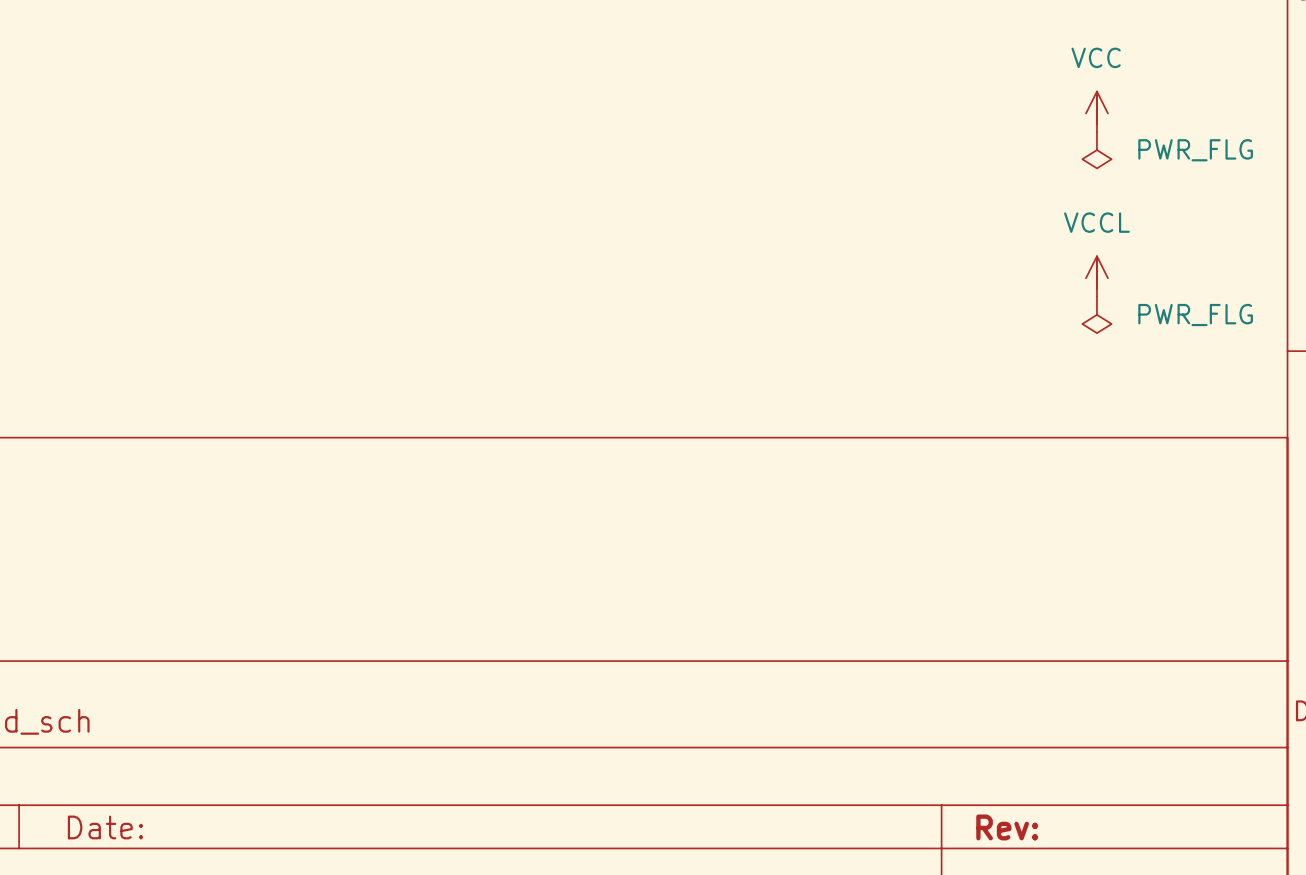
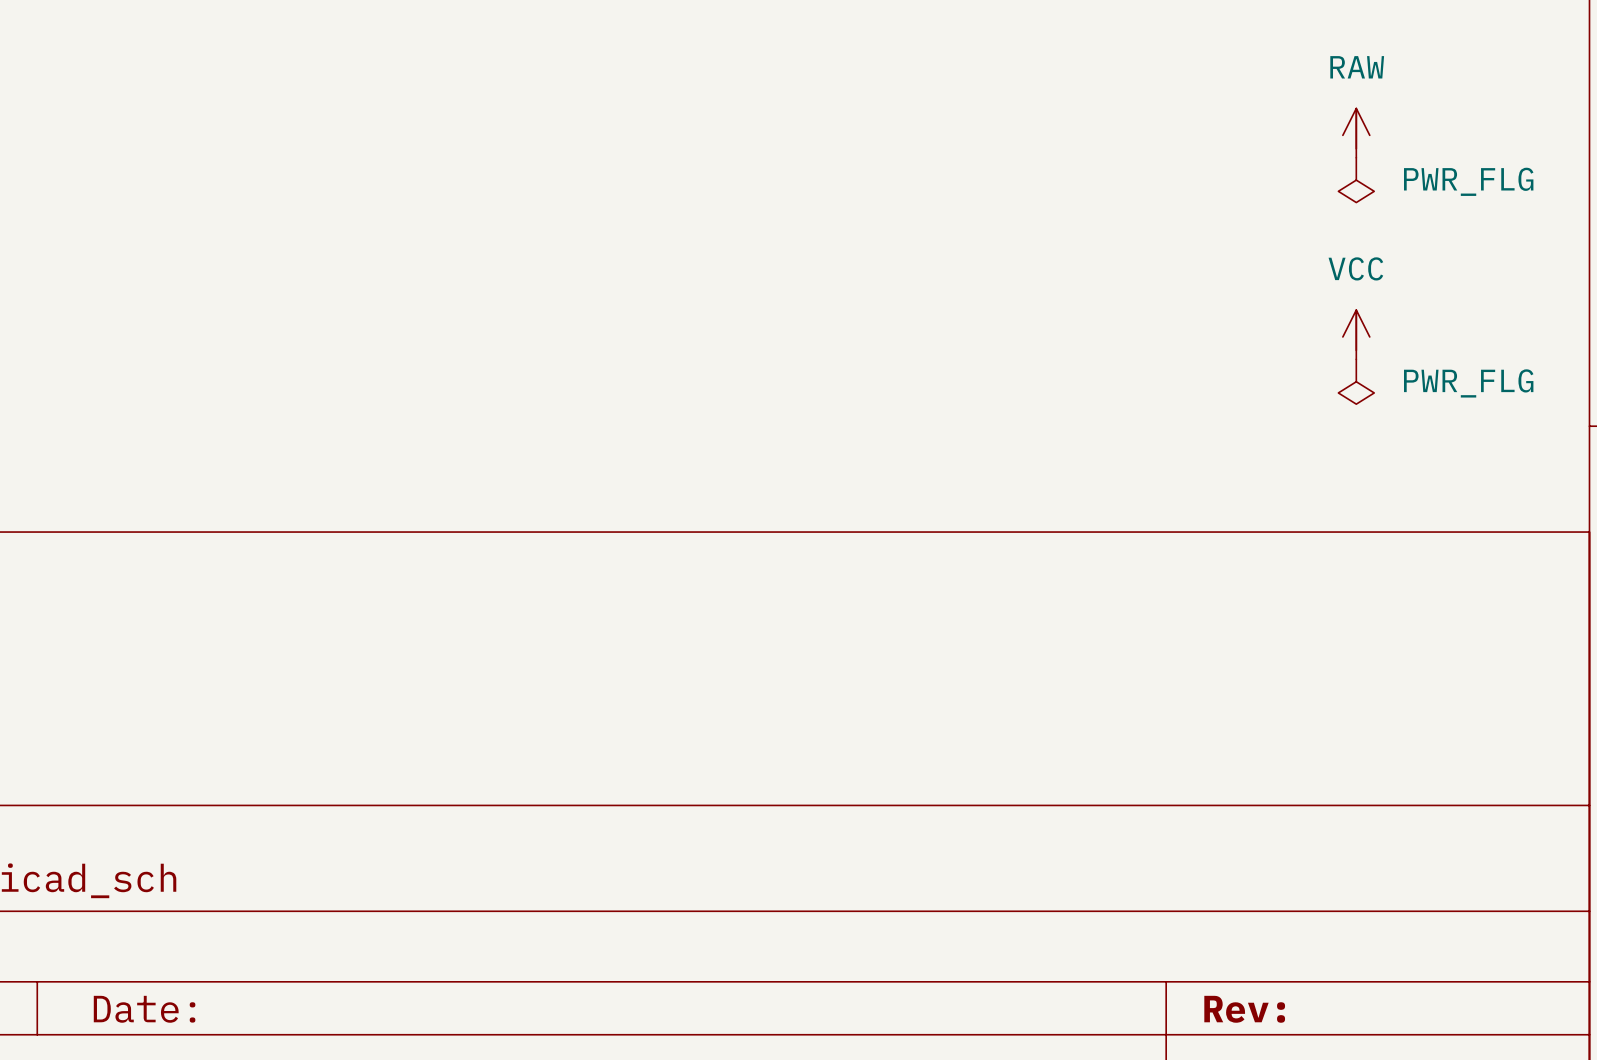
power symbol: VCC (1096, 111) -> RAW (1356, 133)
power symbol: VCCL (1096, 276) -> VCC (1356, 334)

